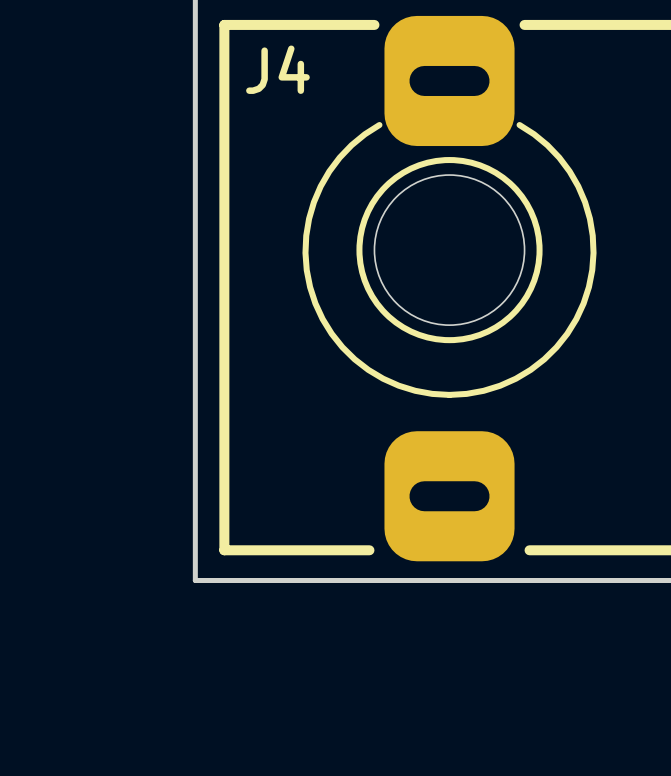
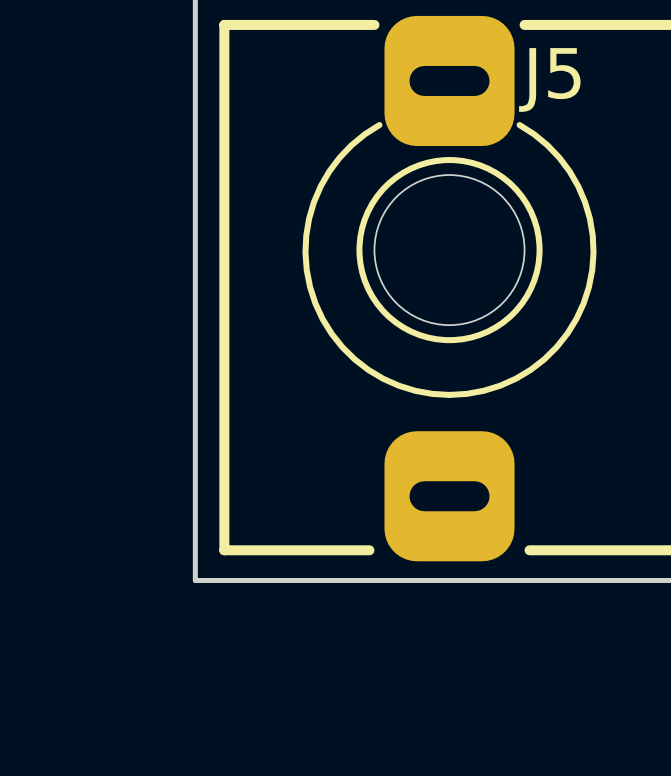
J4 name: J4 (277, 69) -> J5 (549, 79)

